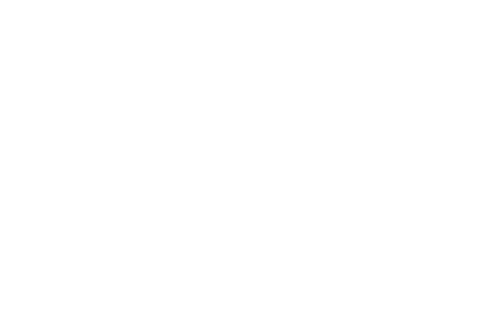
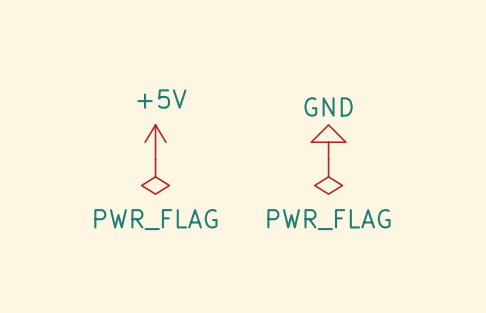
power symbol: none -> +5V (155, 142)
power symbol: none -> GND (328, 142)
power symbol: none -> PWR_FLAG (155, 176)
power symbol: none -> PWR_FLAG (328, 176)

